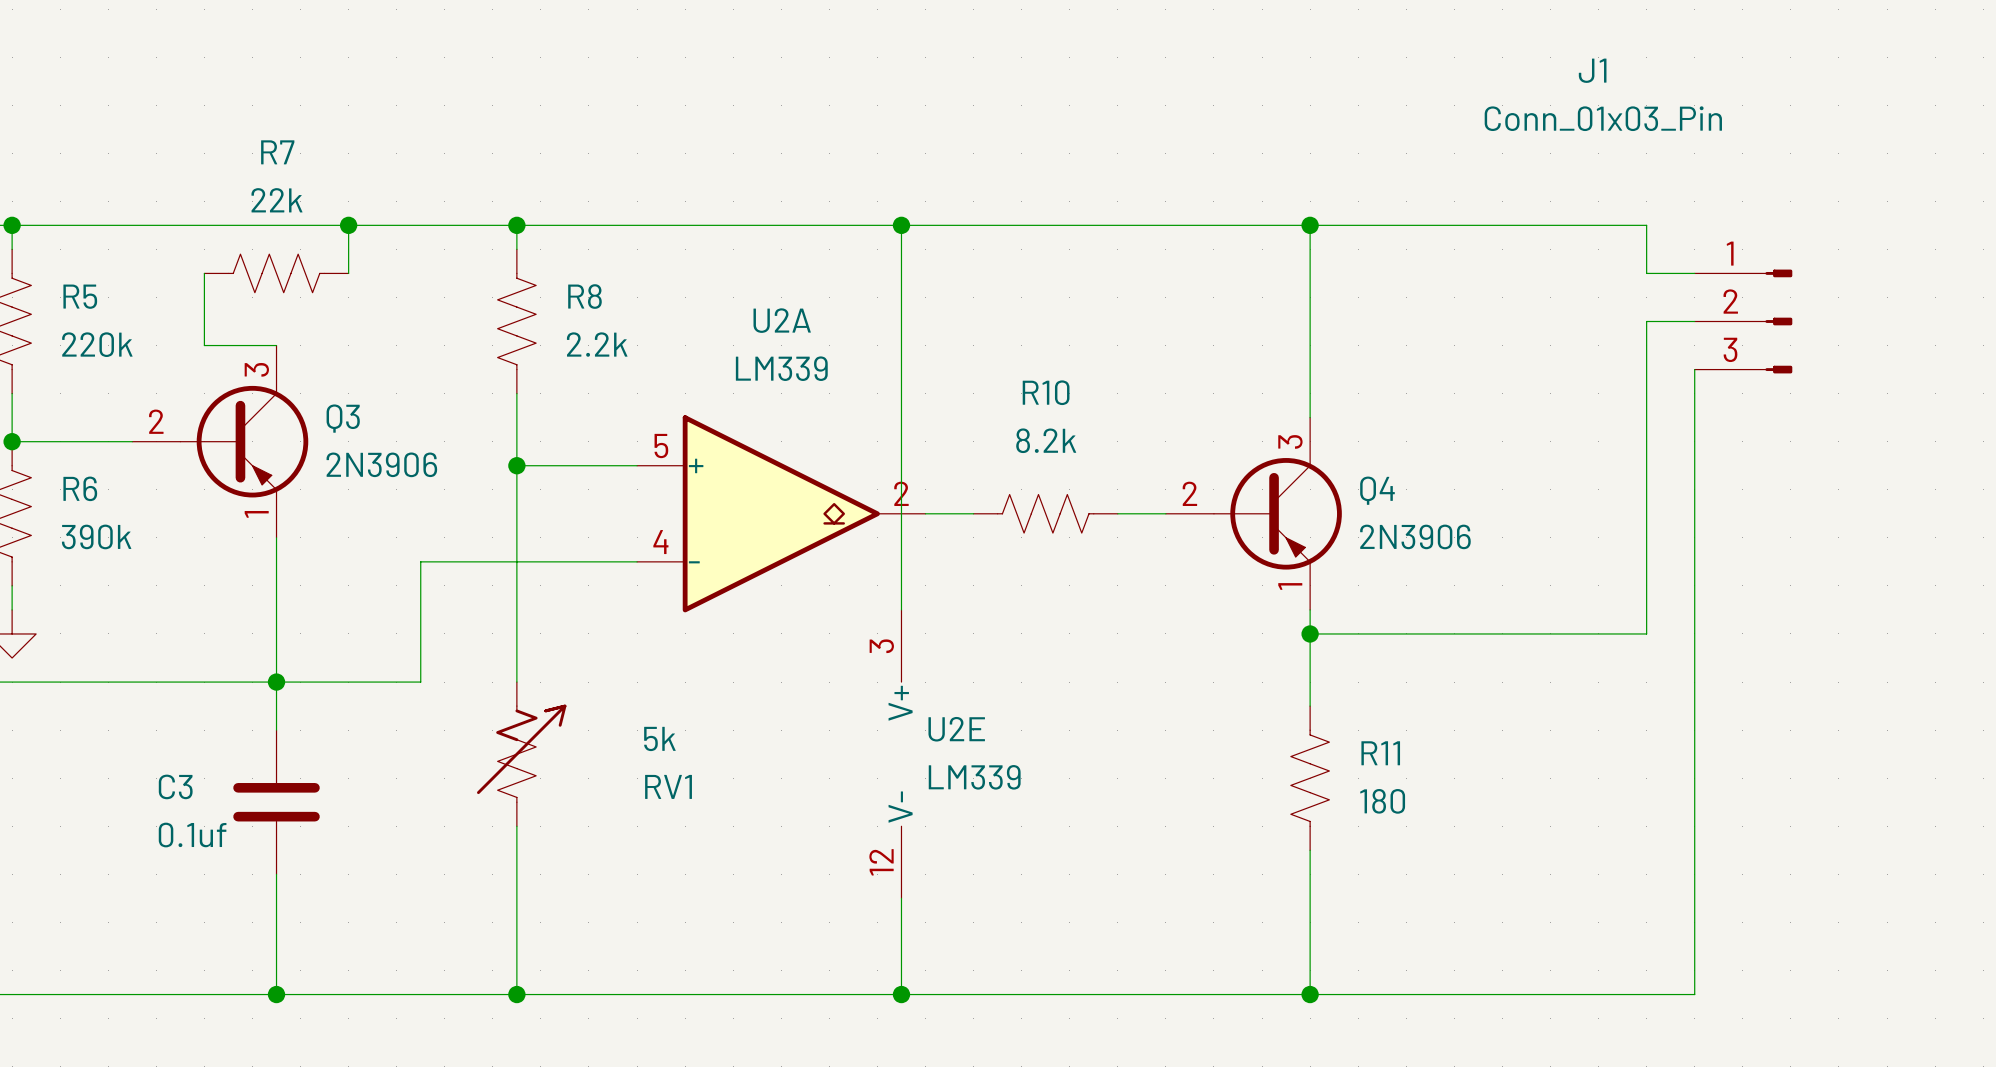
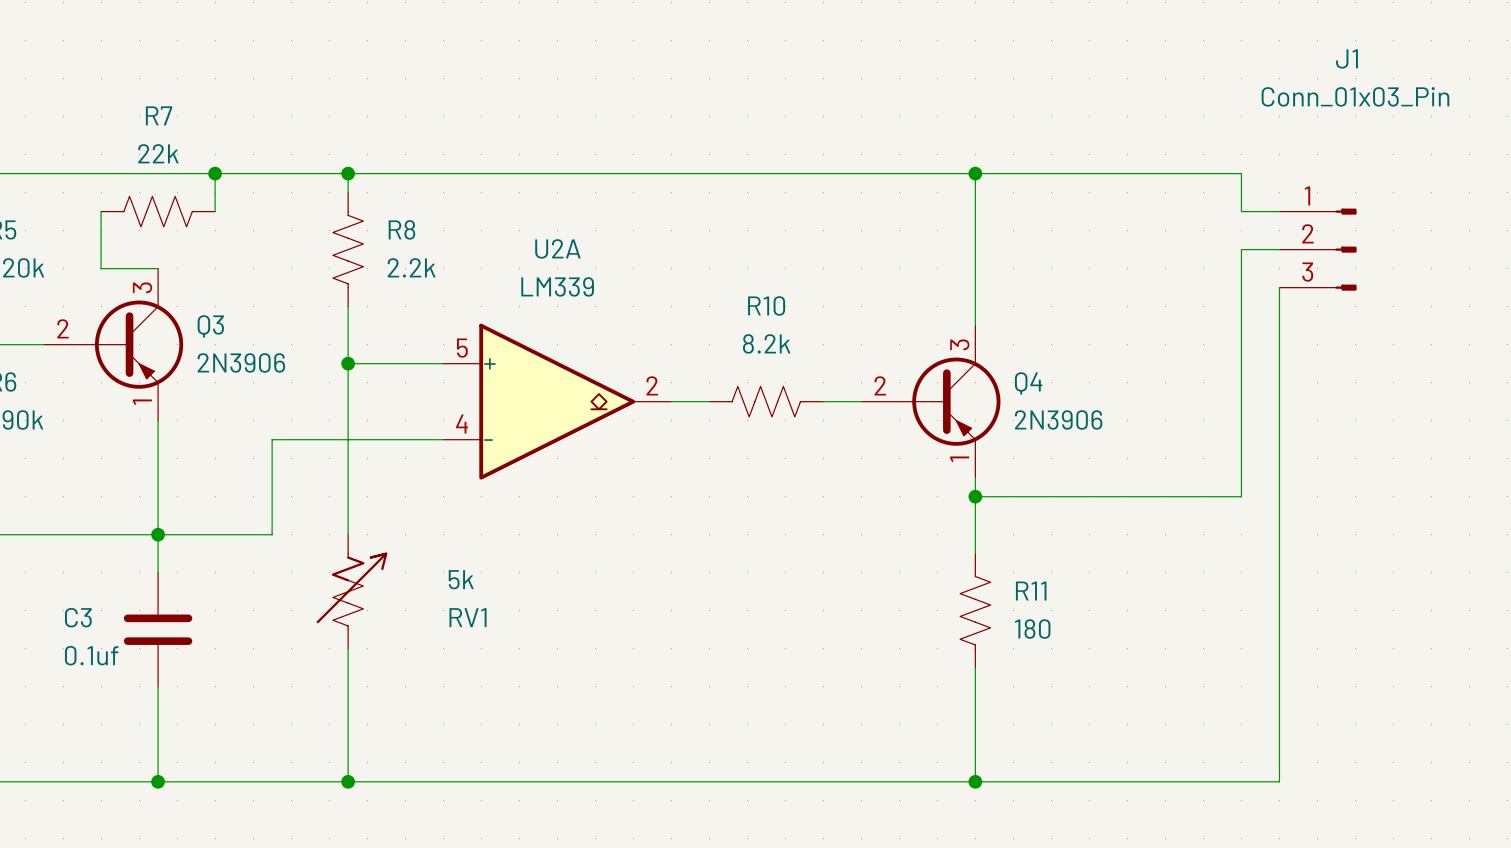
J1 name position: J1 (1592, 70) -> J1 (1347, 58)
J1 value position: Conn_01x03_Pin (1603, 118) -> Conn_01x03_Pin (1355, 96)
wire: (901, 225) (901, 609) -> none
junction: (901, 225) -> none
U2E: LM339 (901, 754) -> none
wire: (901, 898) (901, 994) -> none
junction: (901, 994) -> none

